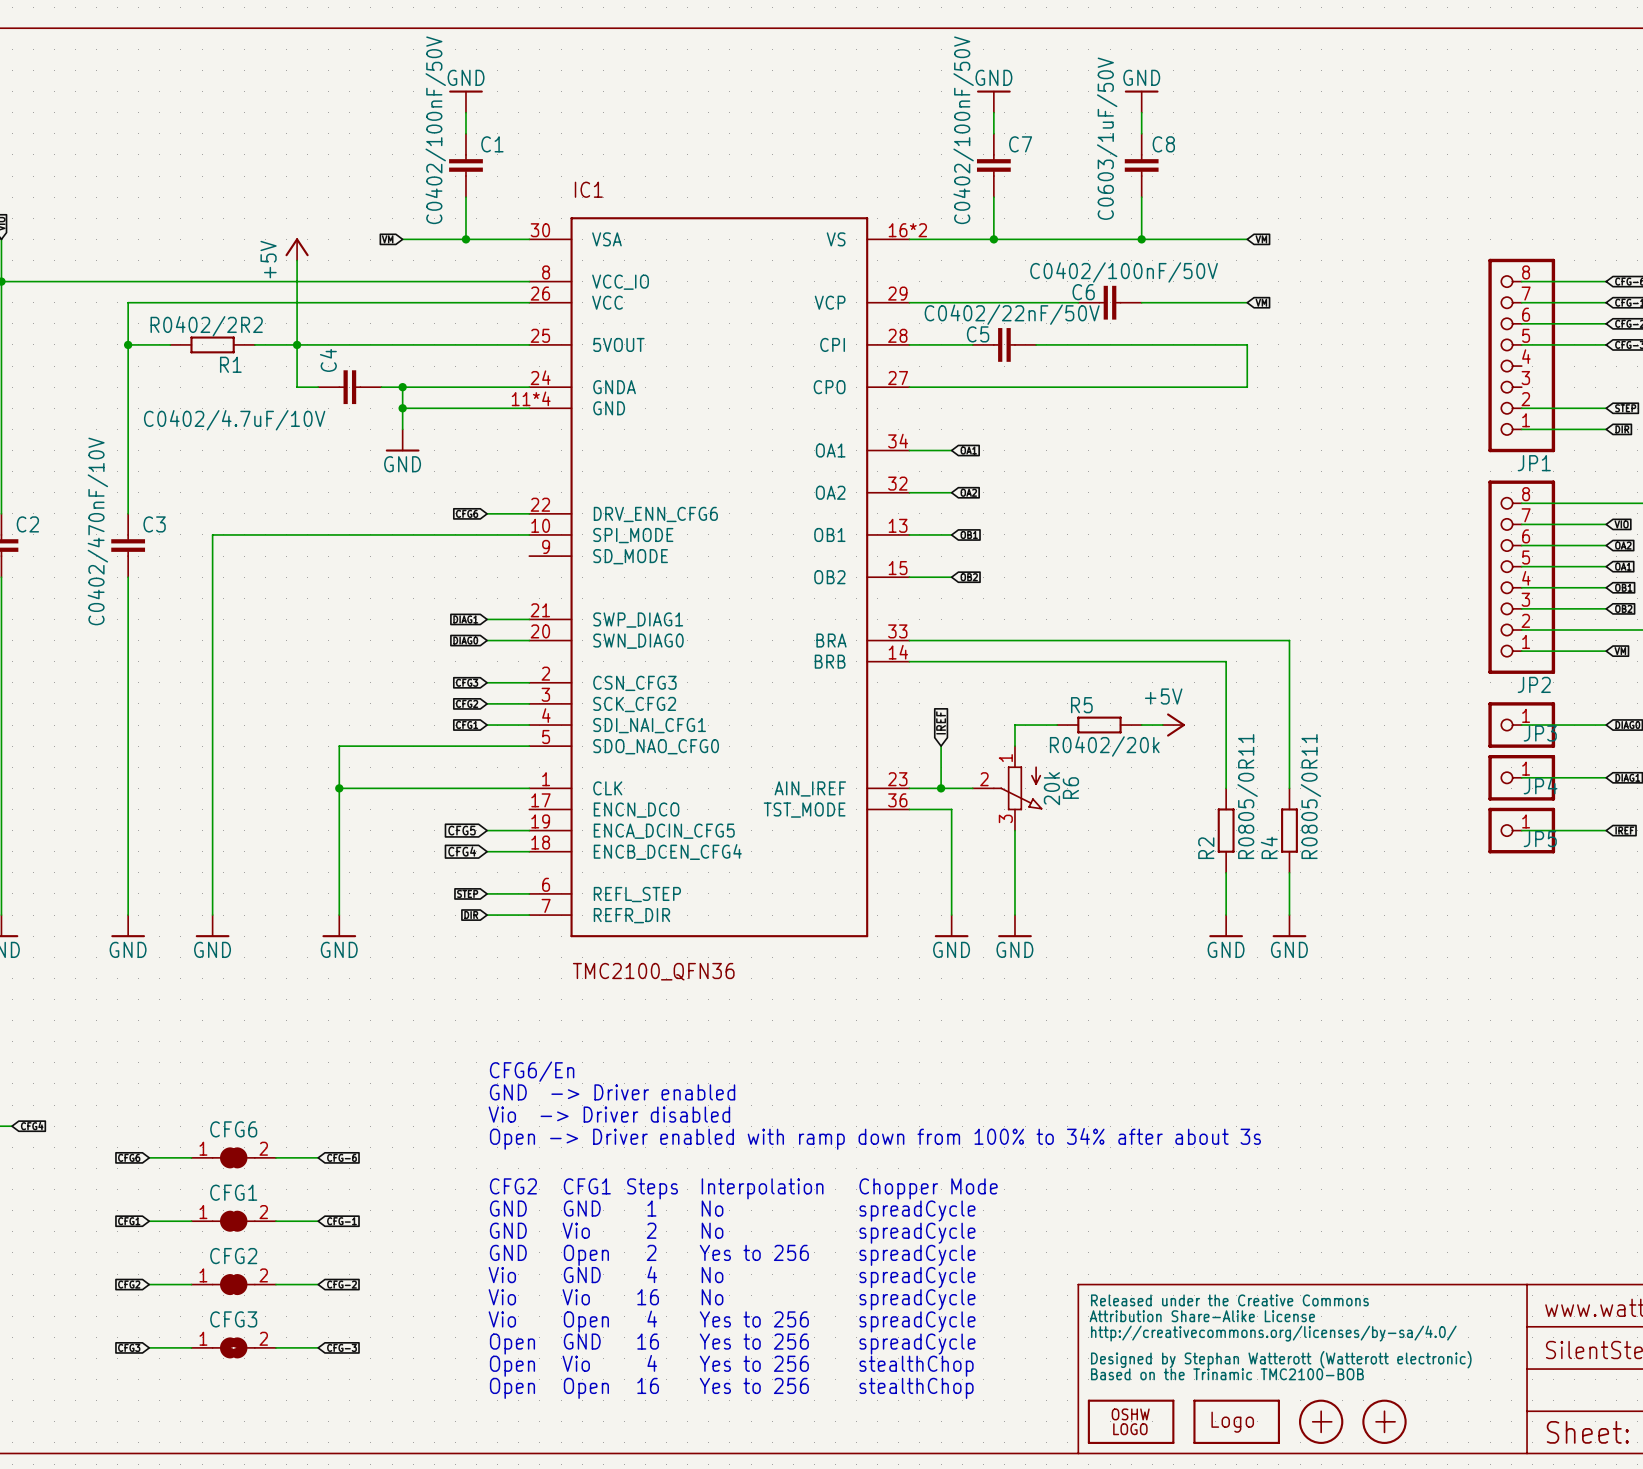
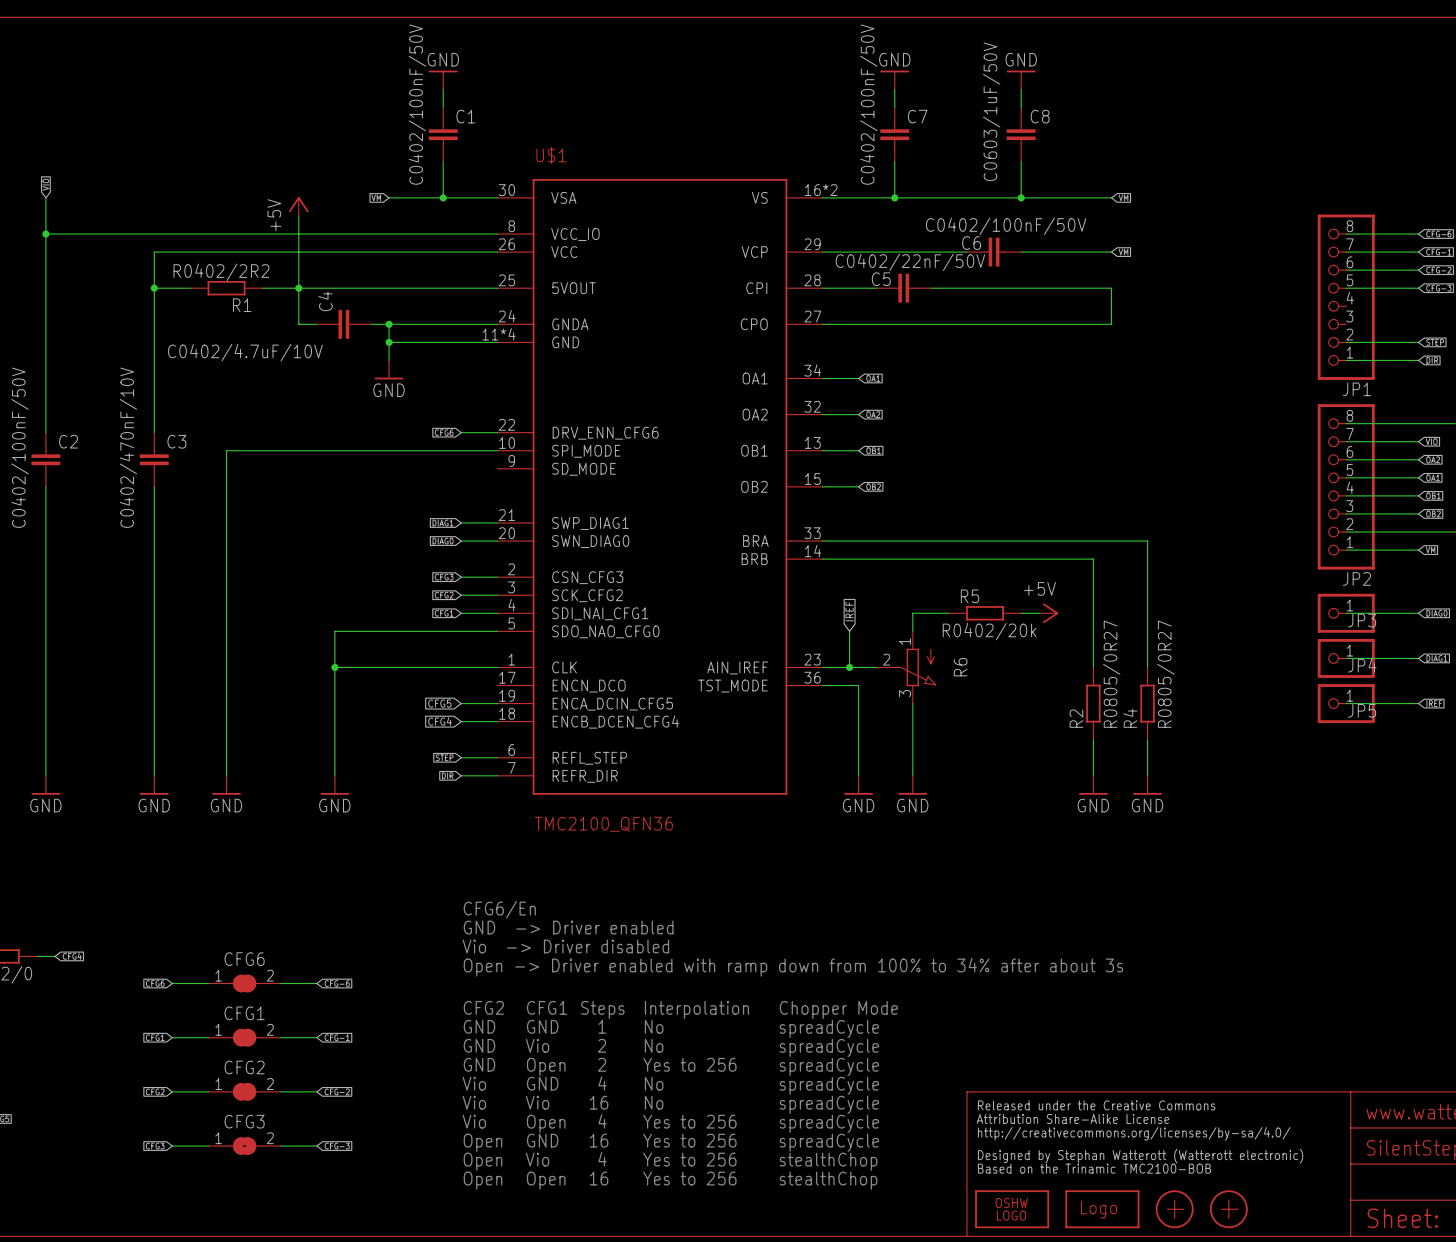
IC1 name: IC1 (588, 189) -> U$1 (551, 155)
R6 value: 20k (1051, 788) -> none
R2 value: R0805/0R11 (1247, 796) -> R0805/0R27 (1111, 674)
R4 value: R0805/0R11 (1310, 796) -> R0805/0R27 (1165, 674)

